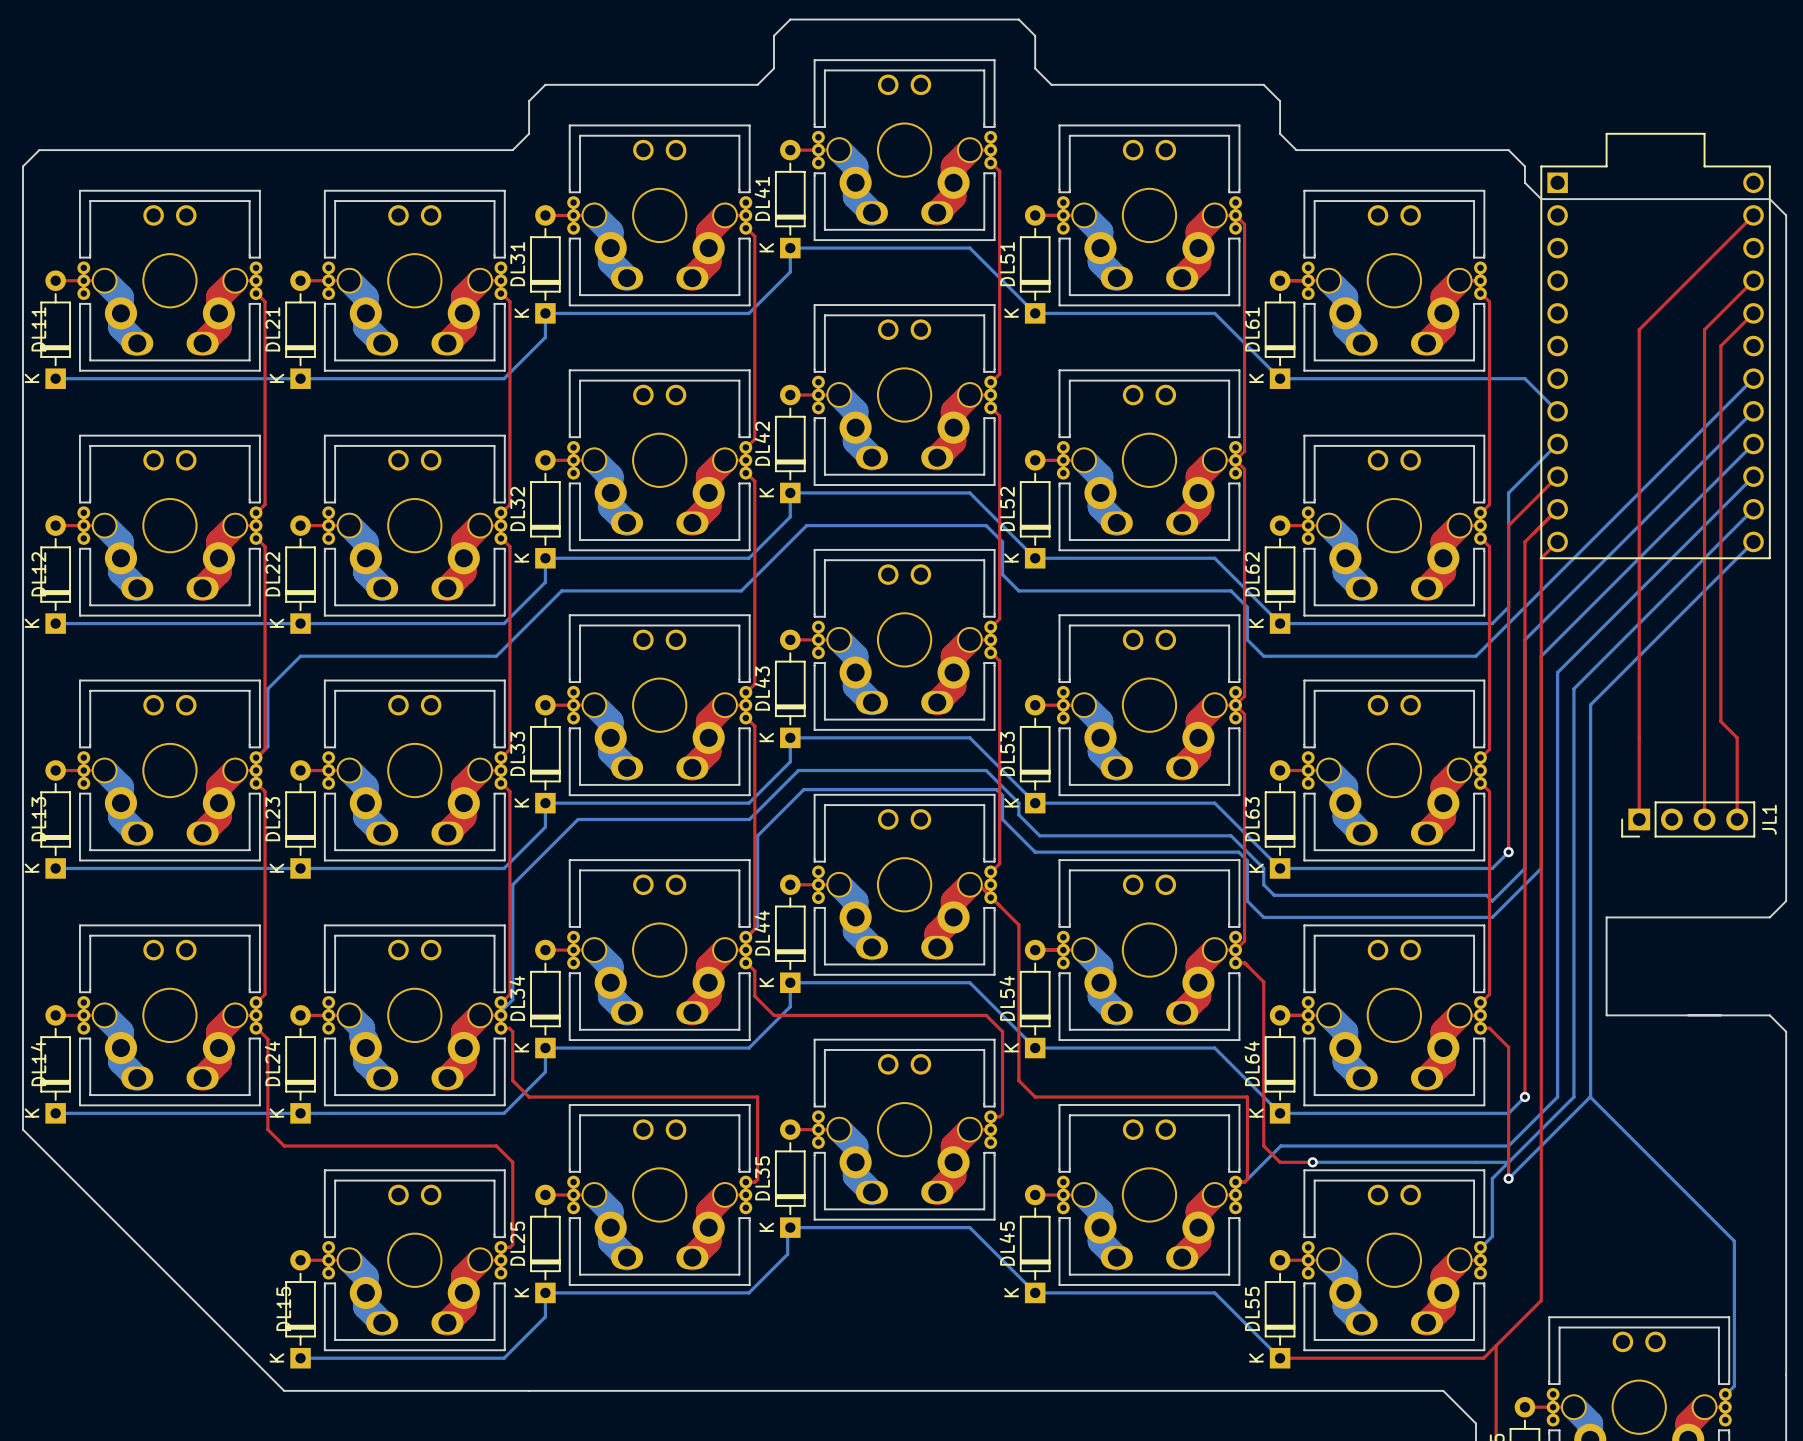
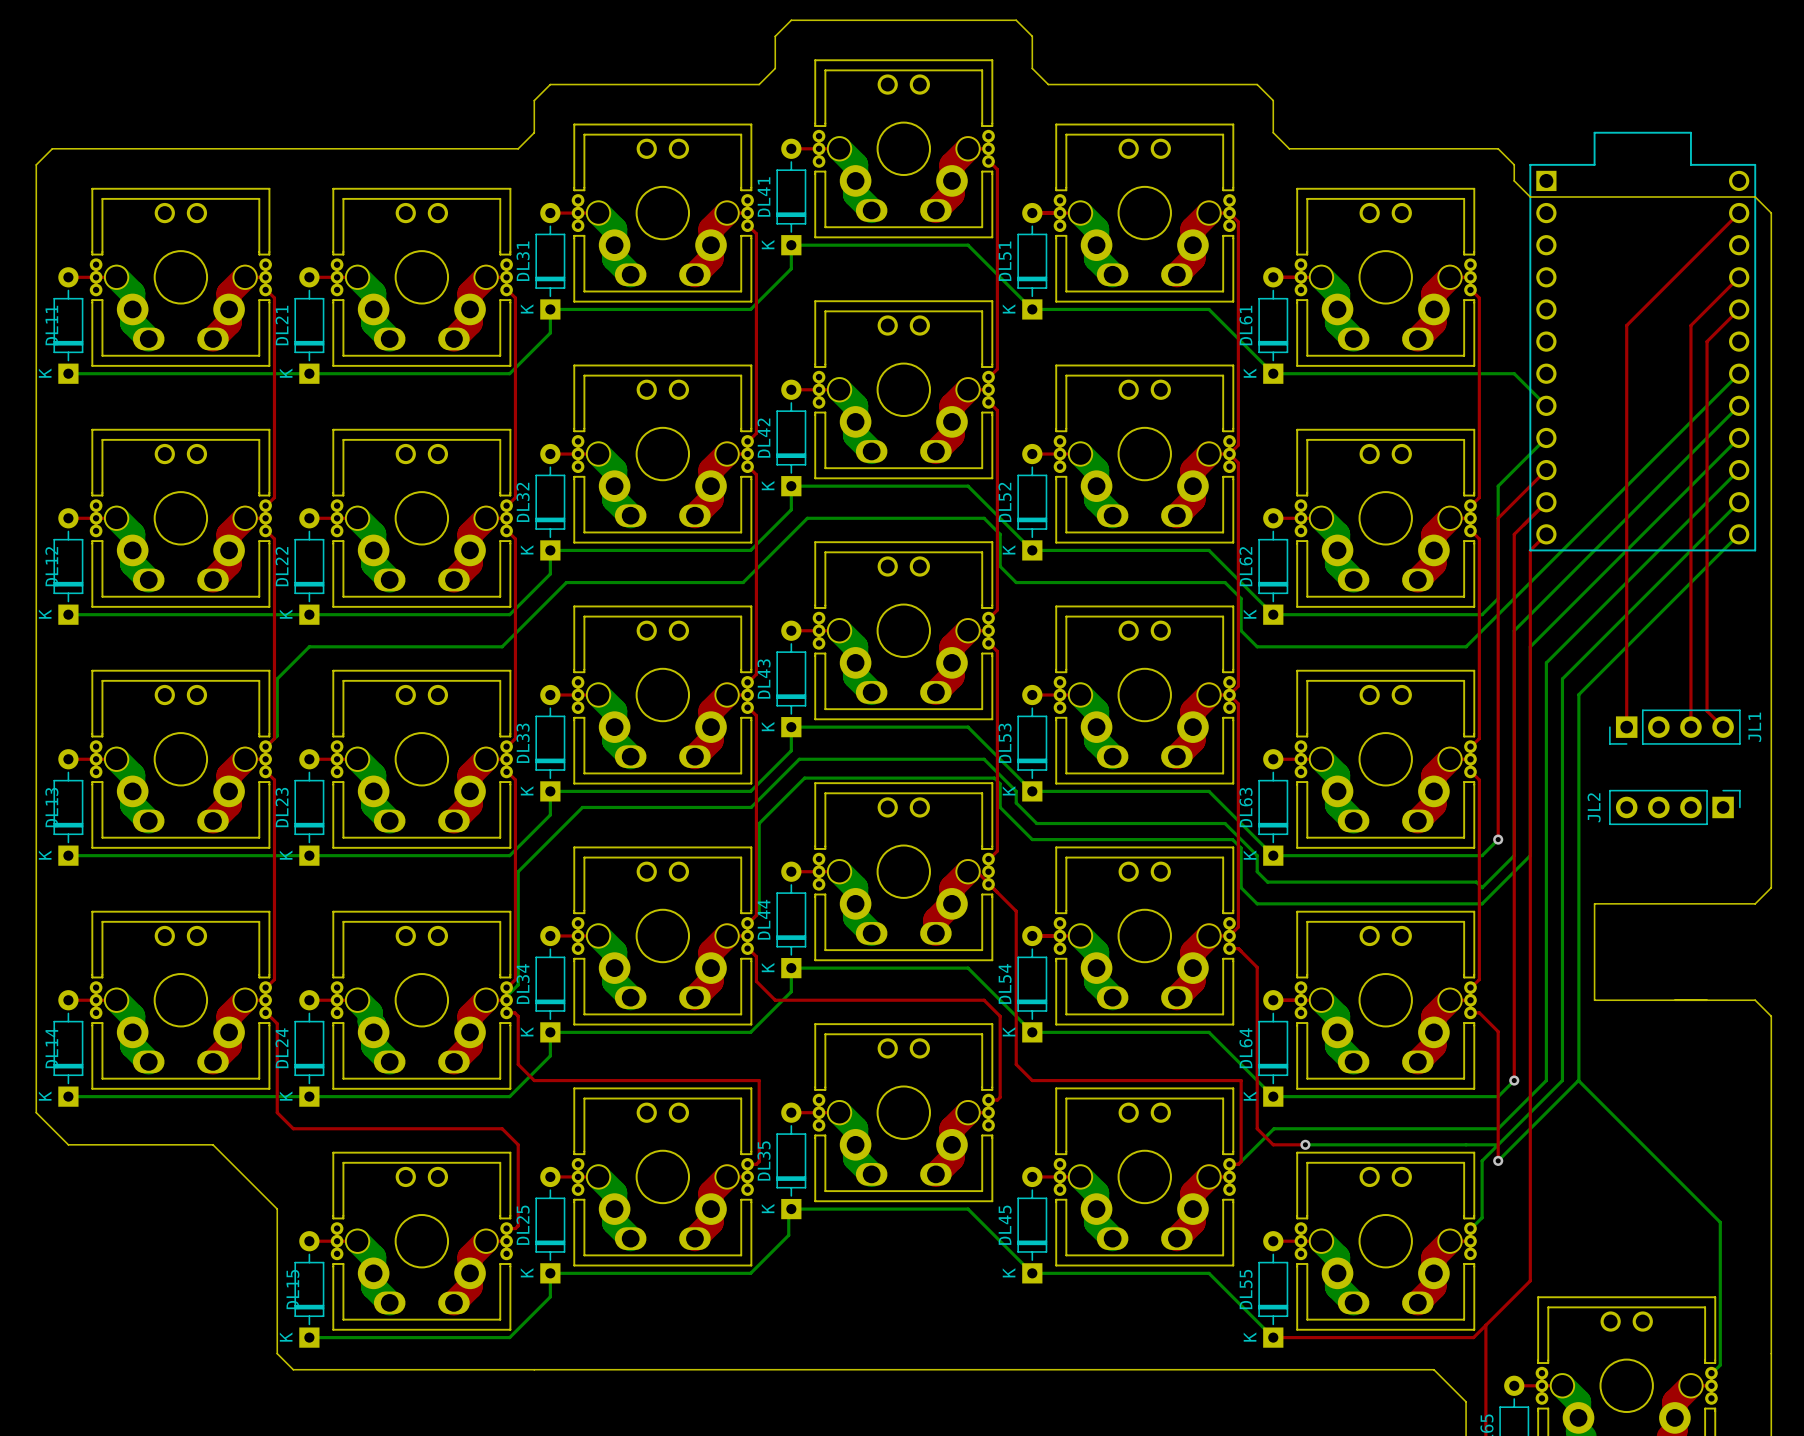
top track: (1639, 737) (1639, 819) -> none
top track: (1704, 737) (1704, 819) -> none
top track: (1737, 737) (1737, 819) -> none
JL1 position: (1688, 819) -> (1674, 727)
JL2: none -> (1674, 807)
board edge: (55, 1162) (267, 1374) -> (68, 1144) (213, 1144) (277, 1209) (277, 1353)

